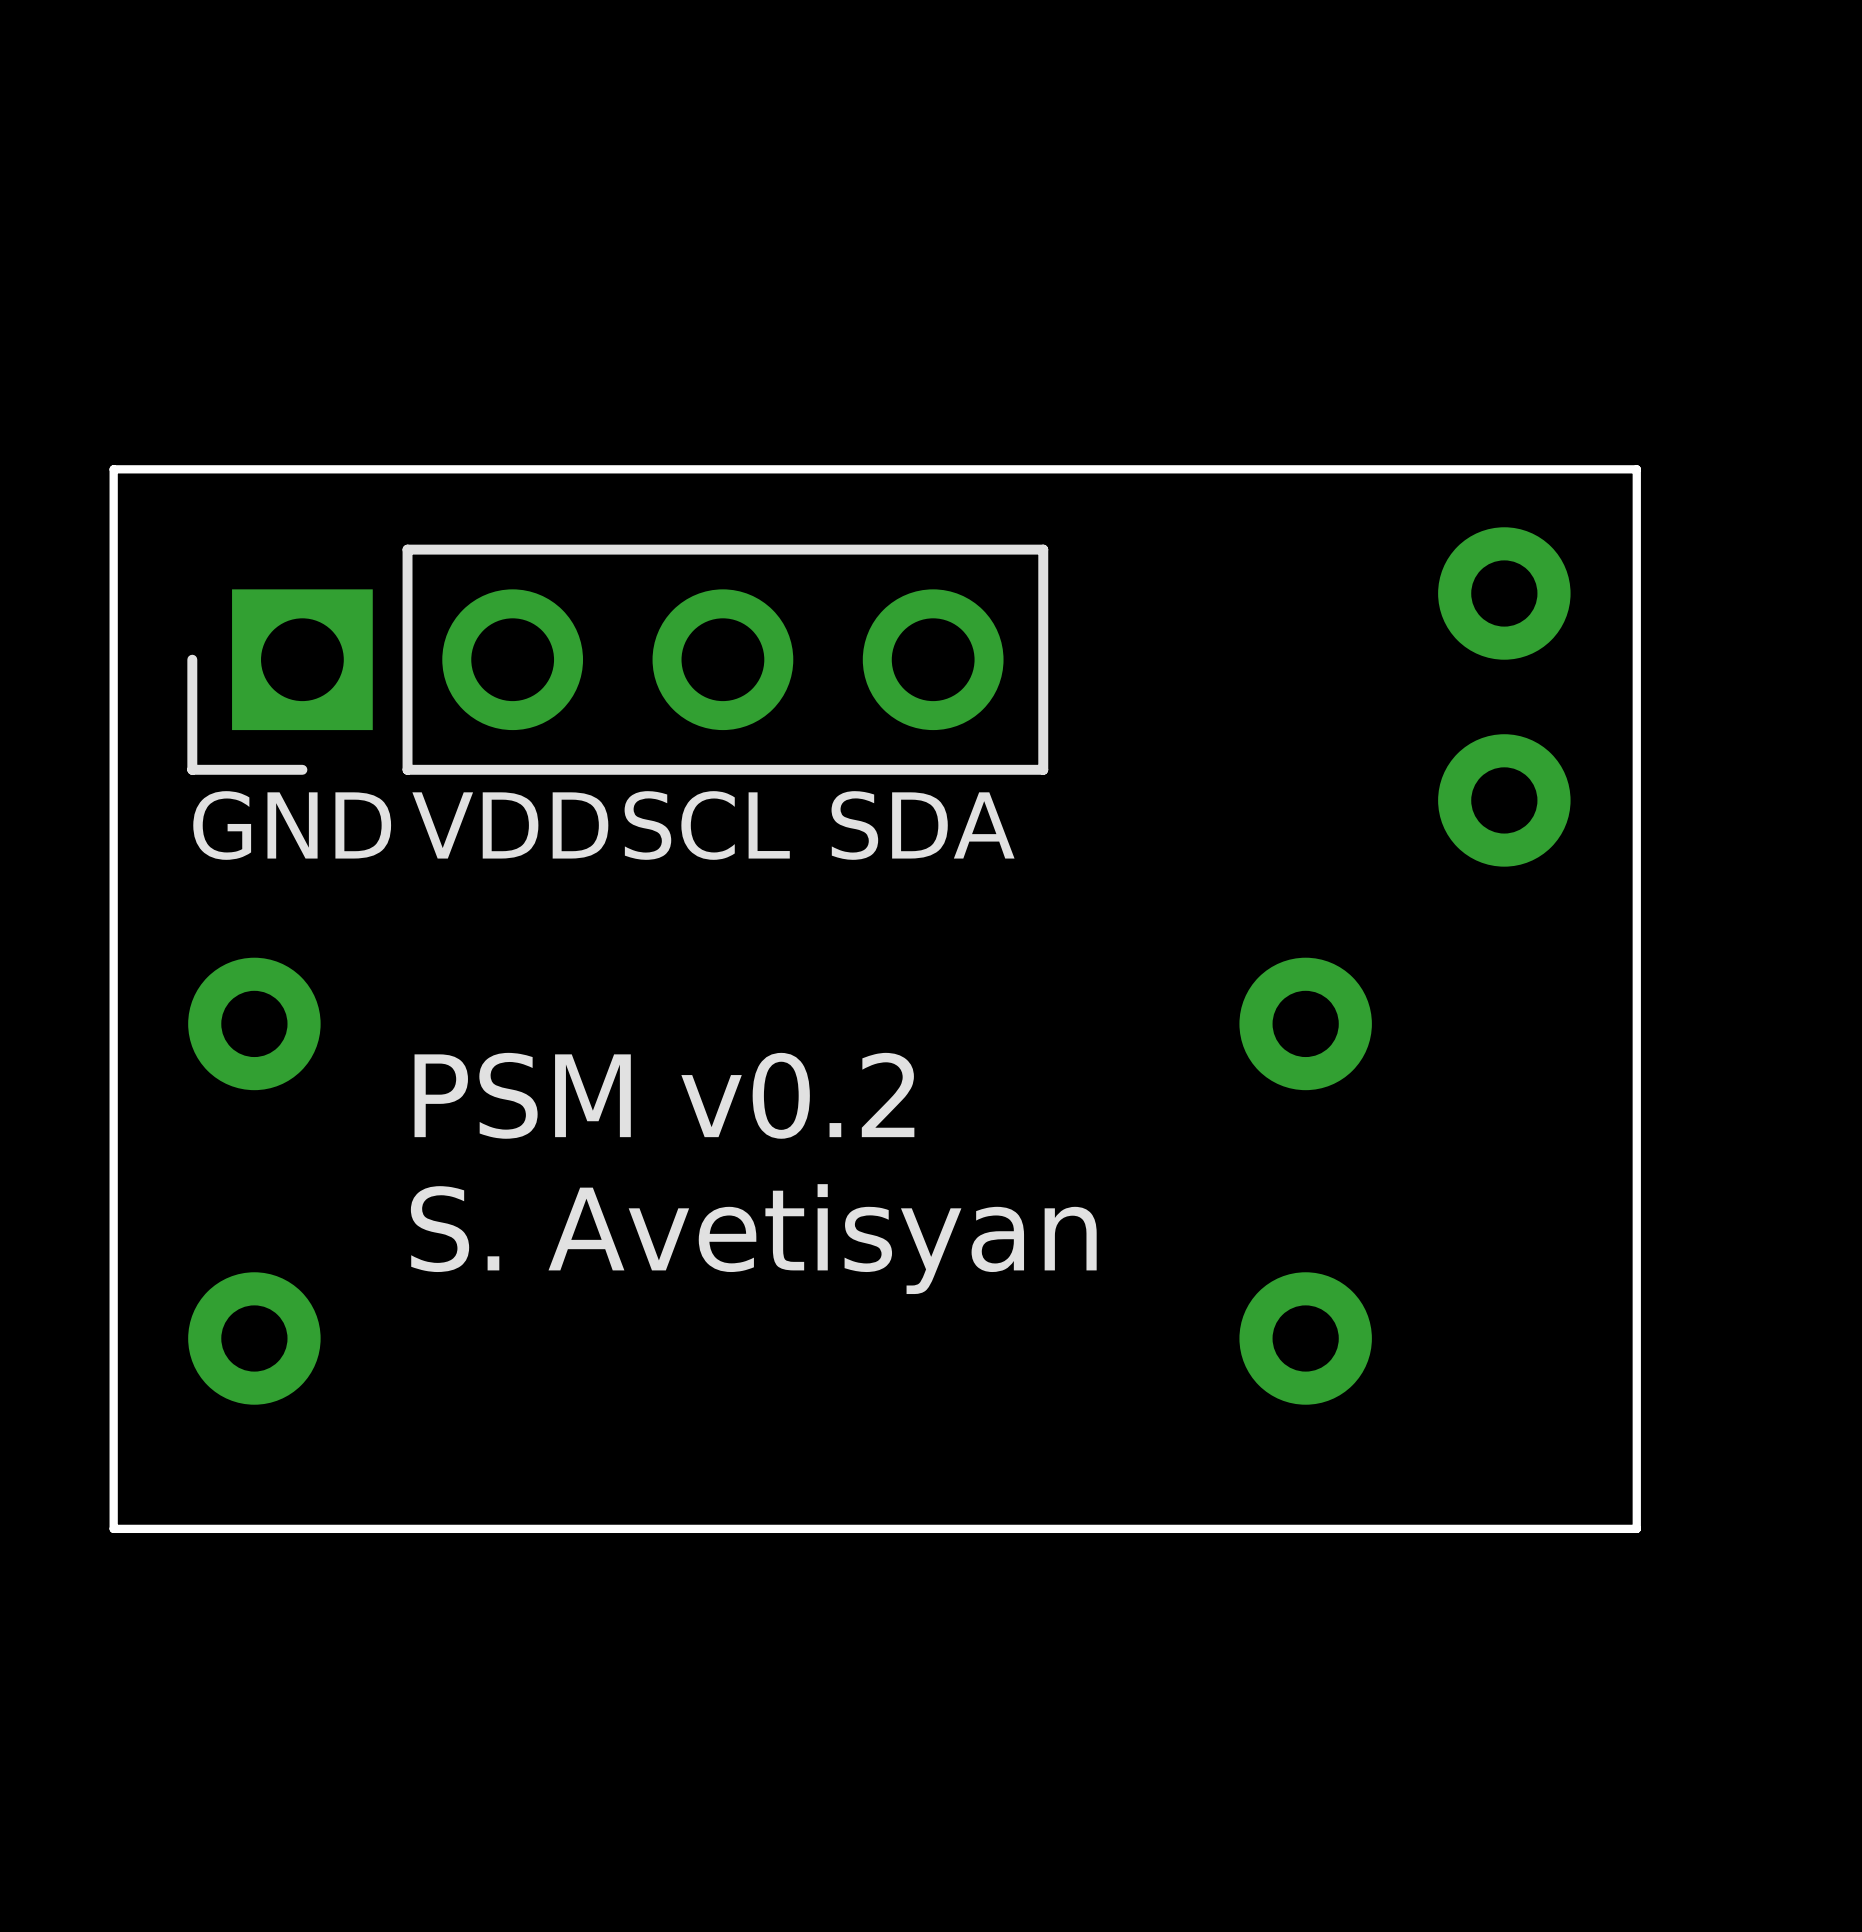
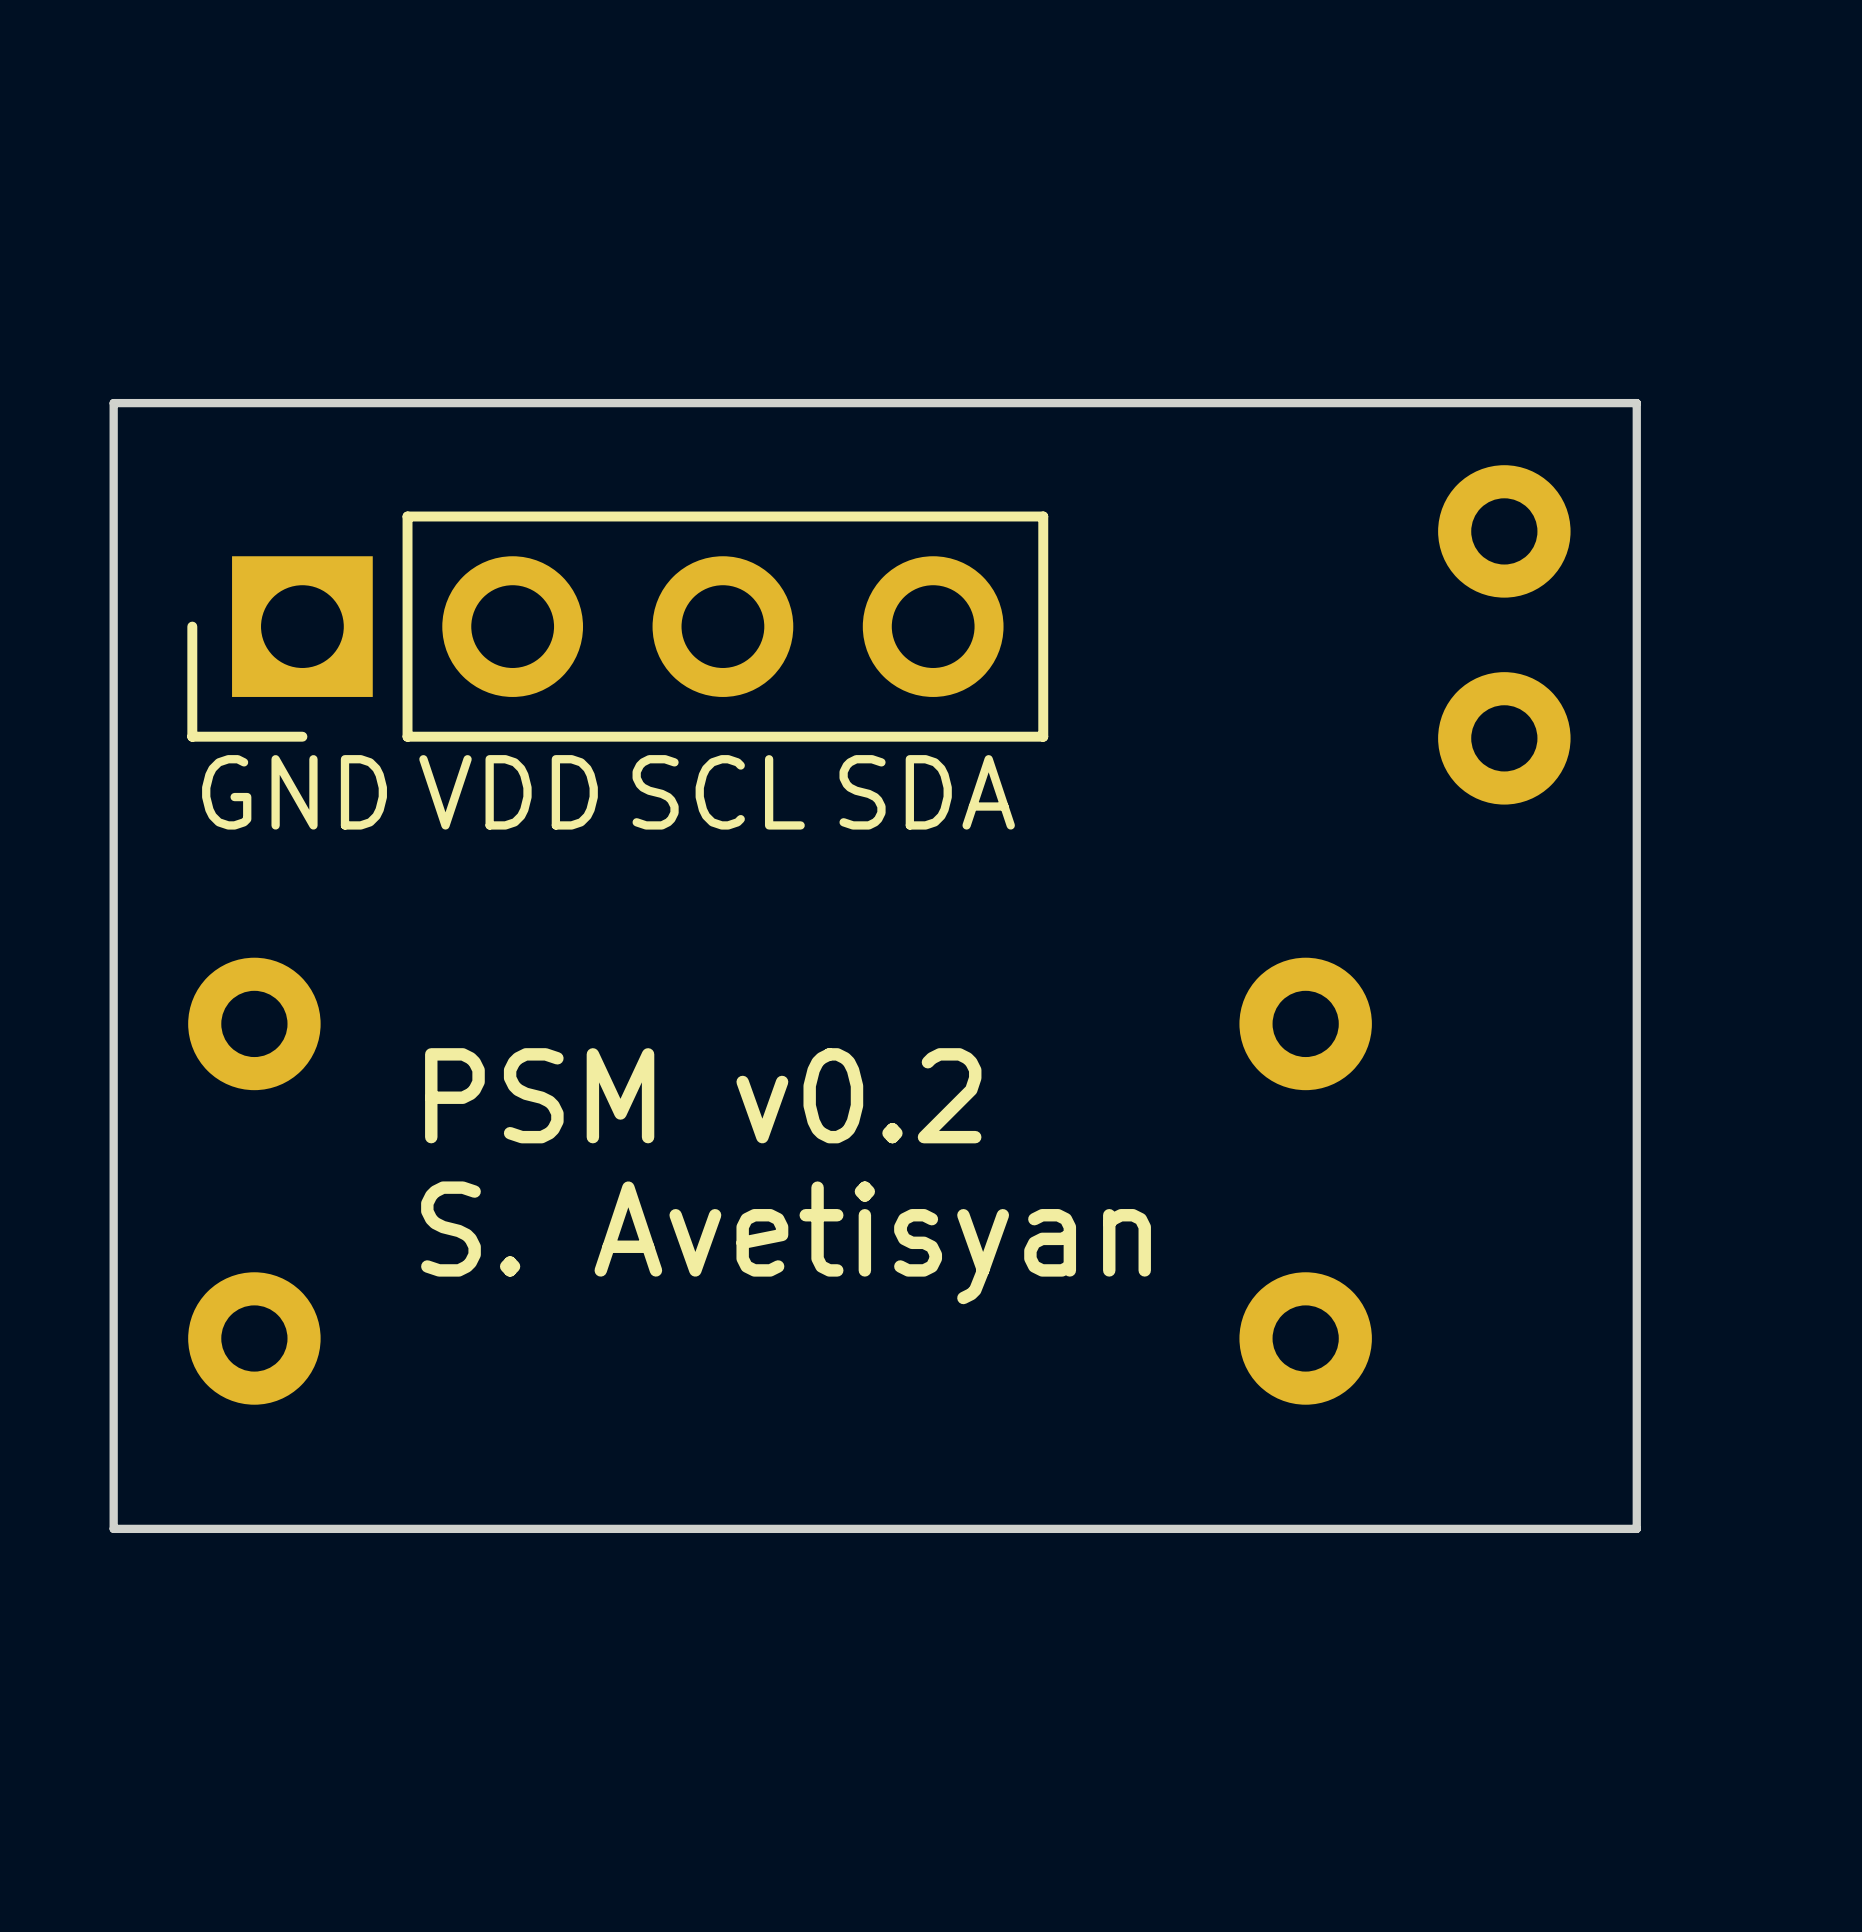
board edge: (1636, 469) (113, 469) -> (1636, 469) (1636, 403) (113, 403) (113, 469)
part position: (617, 659) -> (617, 626)
part position: (1504, 696) -> (1504, 634)
text position: GND (292, 825) -> GND (294, 792)
text position: VDD (510, 825) -> VDD (508, 792)
text position: SCL (707, 825) -> SCL (718, 792)
text position: SDA (923, 825) -> SDA (927, 792)

